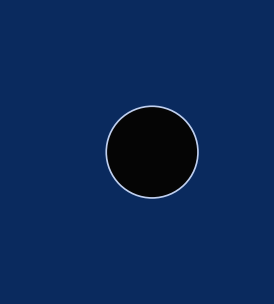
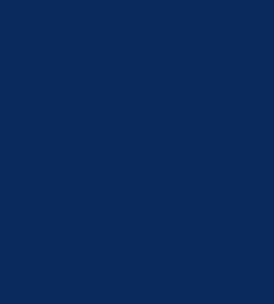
part: (152, 152) -> none

